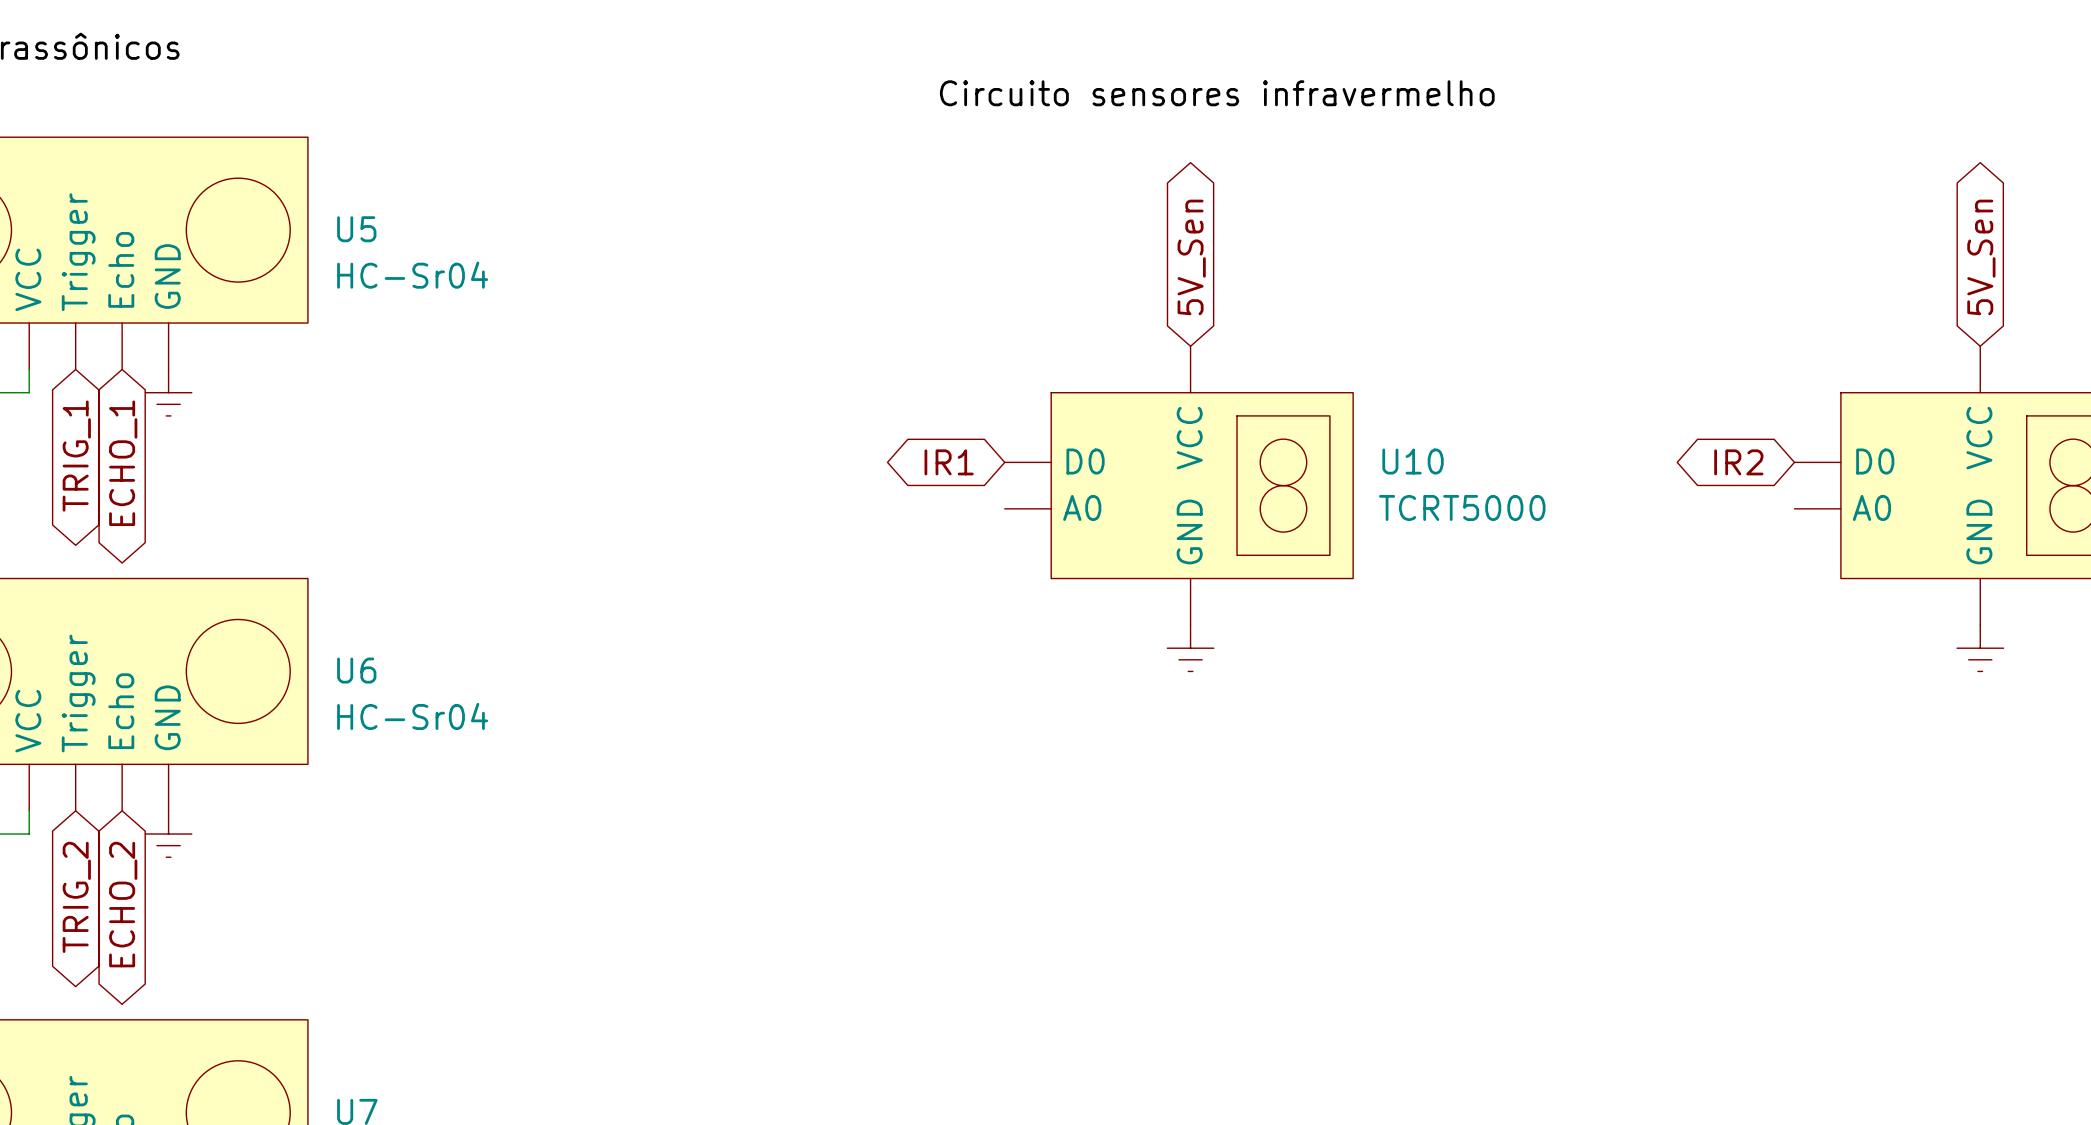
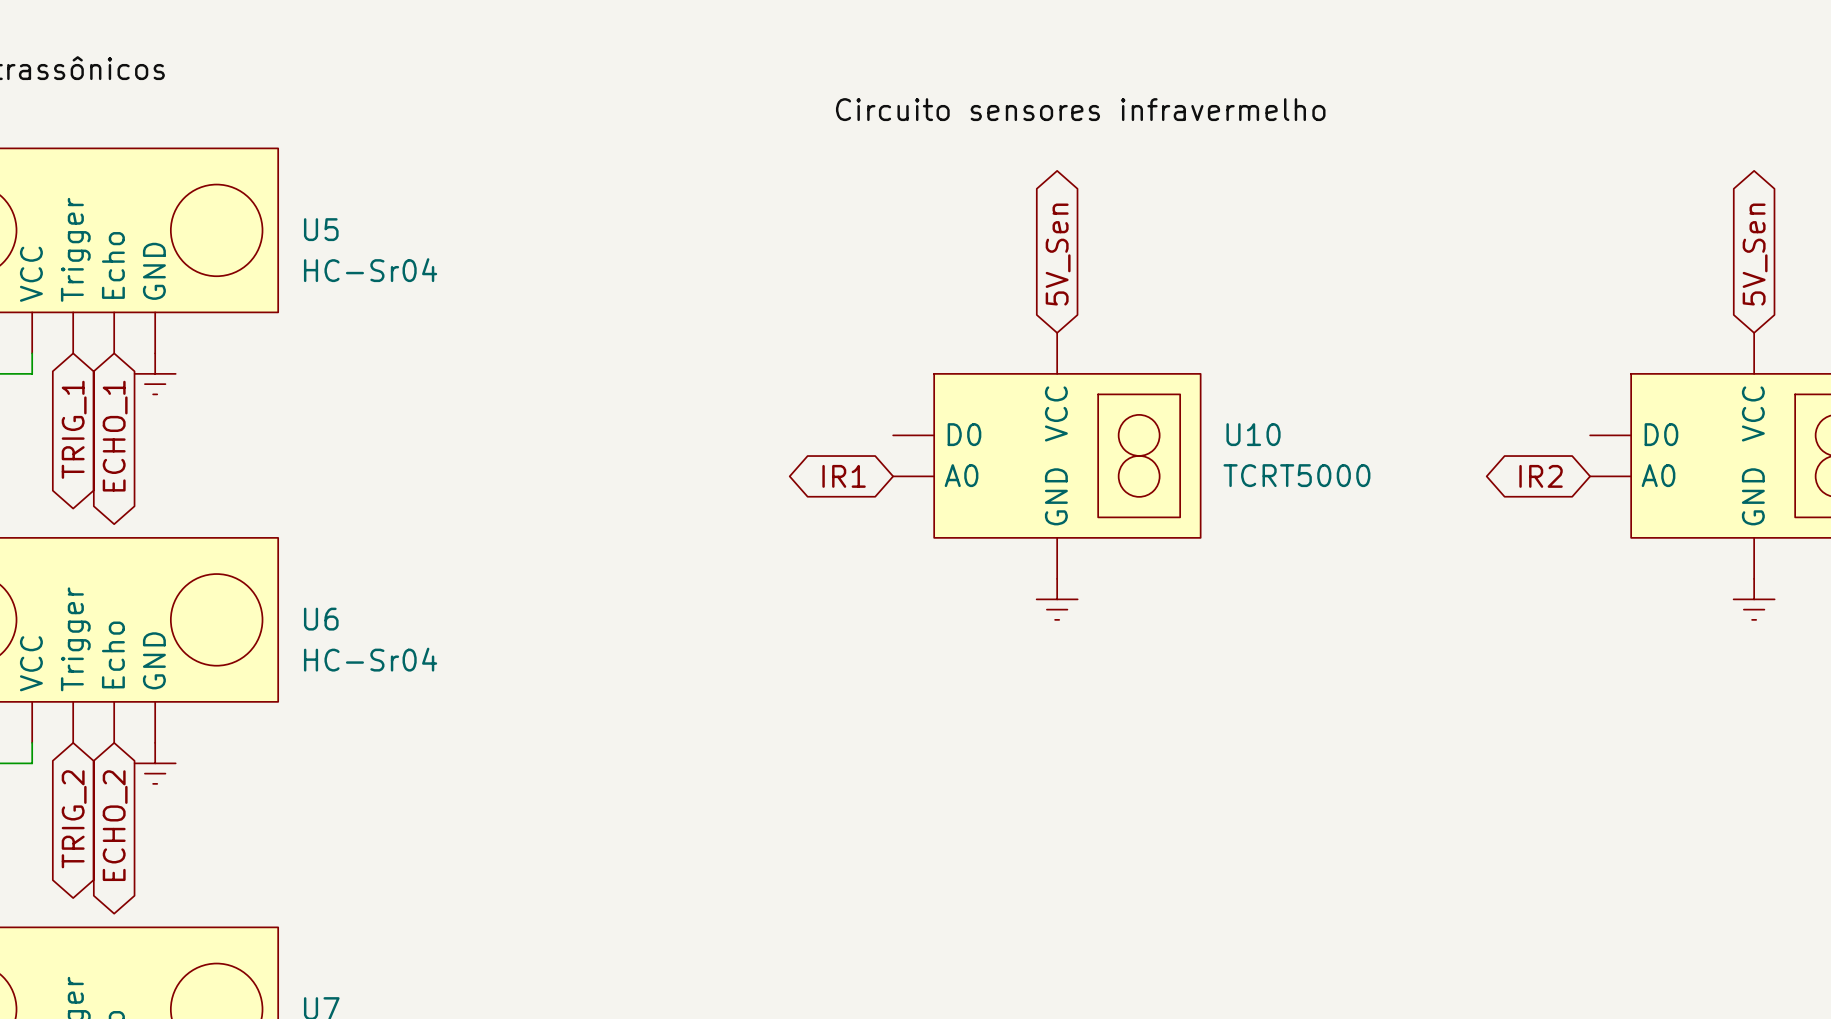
global label position: IR1 (949, 462) -> IR1 (844, 476)
global label position: IR2 (1738, 462) -> IR2 (1541, 476)

